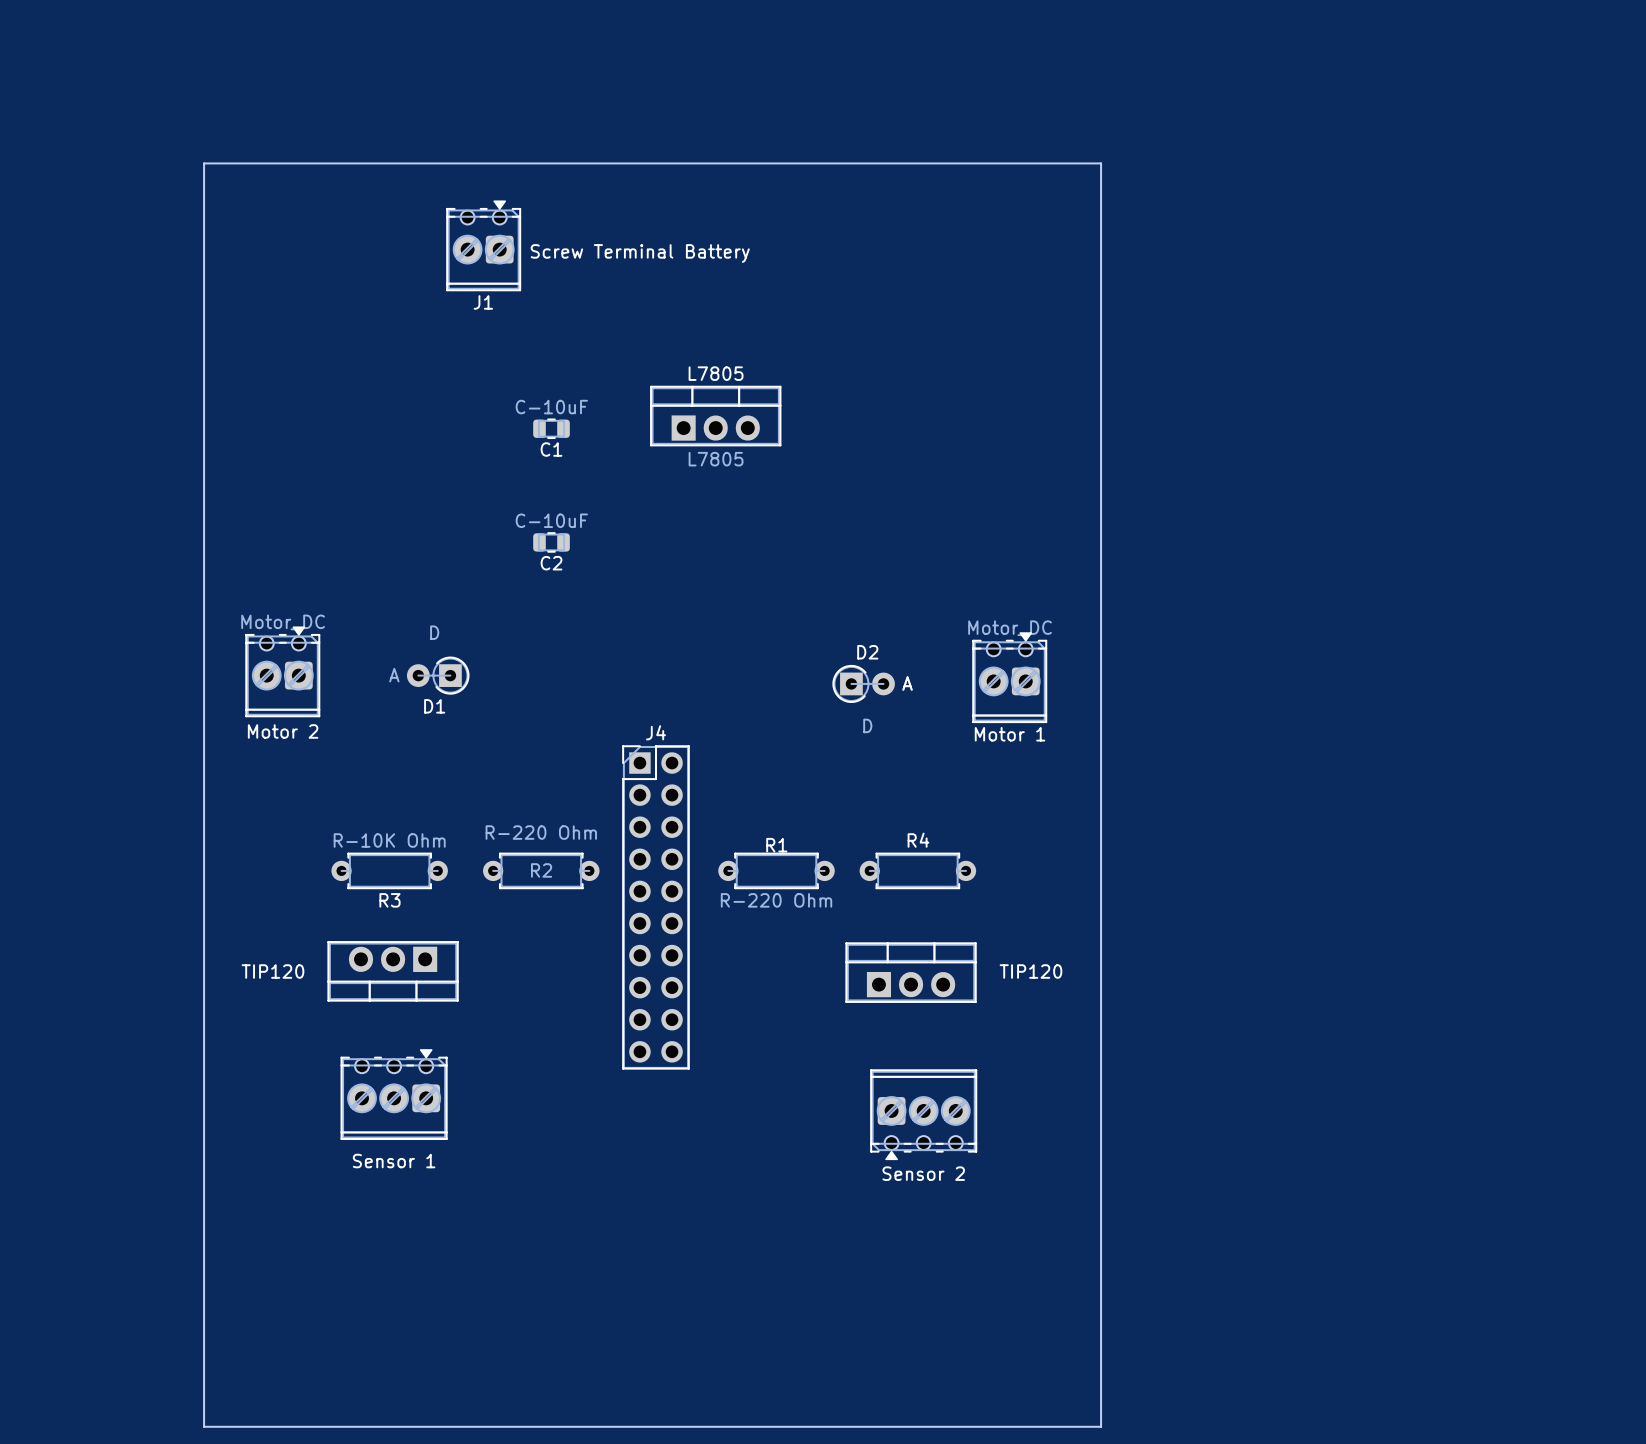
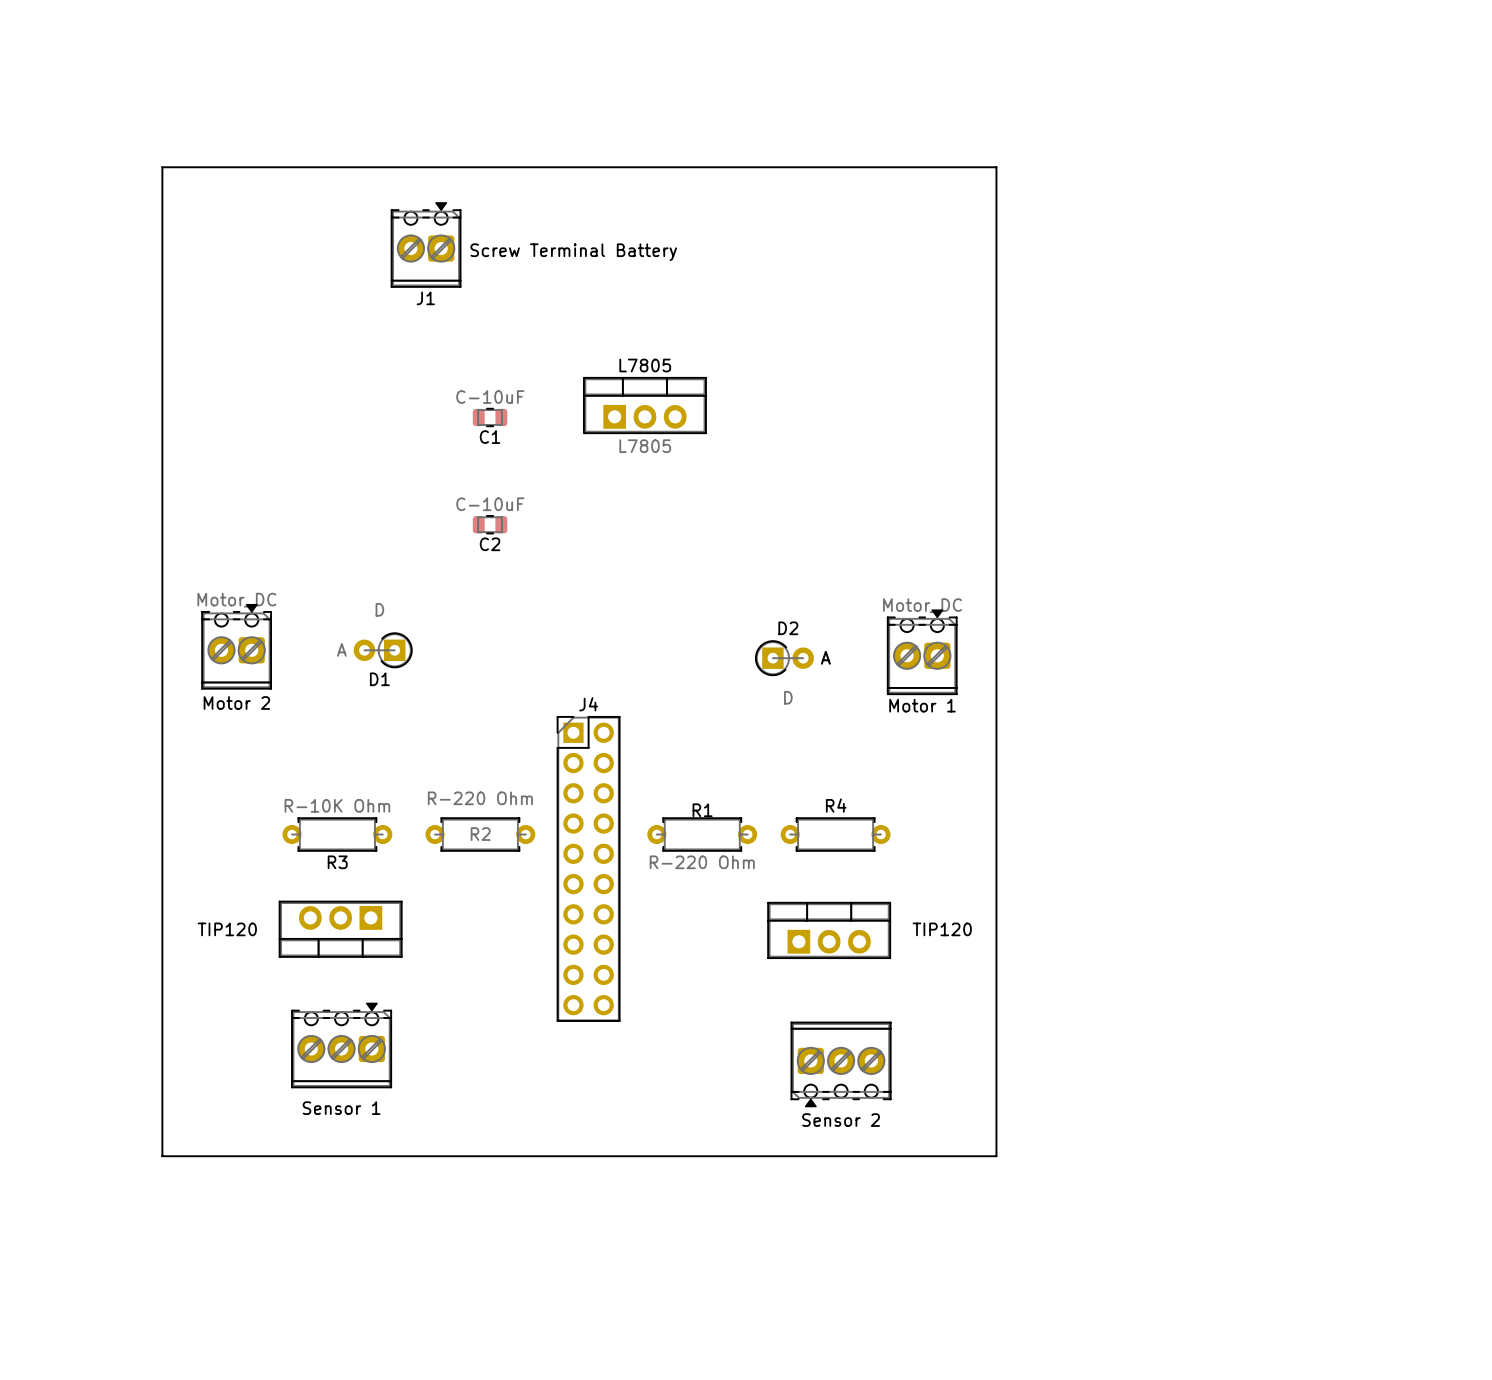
board edge: (1088, 163) (1101, 163) (1101, 1426) (204, 1426) (204, 1212) -> (996, 167) (996, 1156) (162, 1156)

